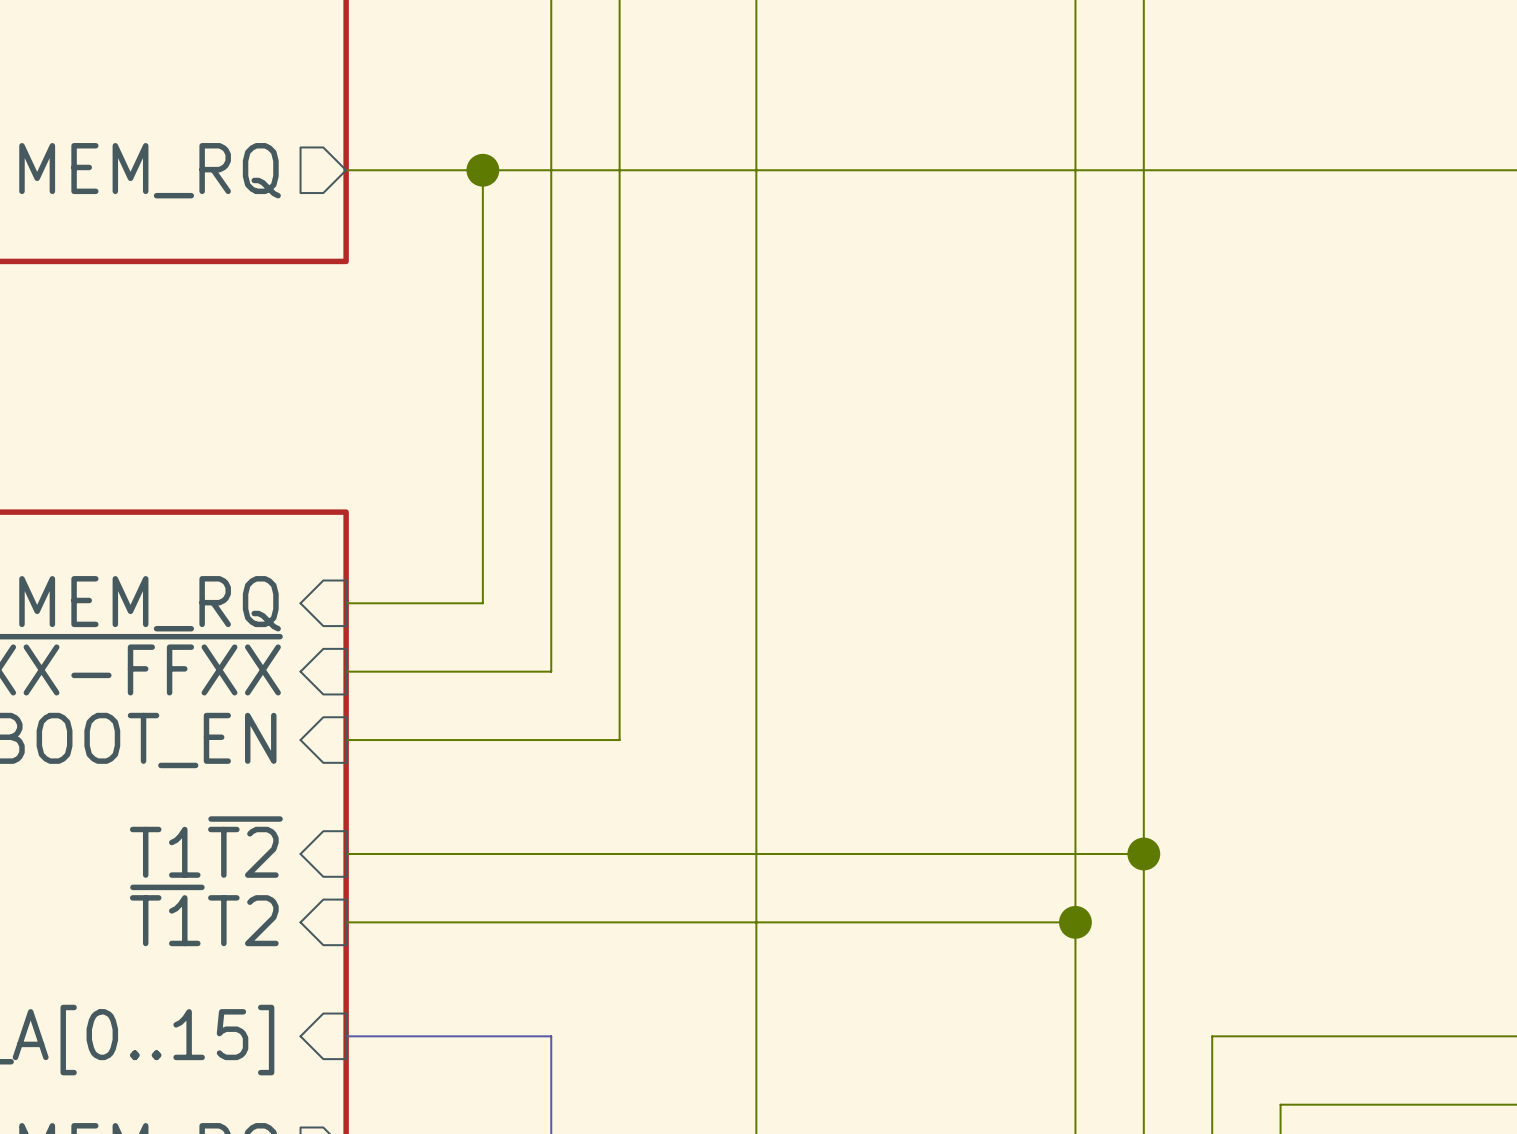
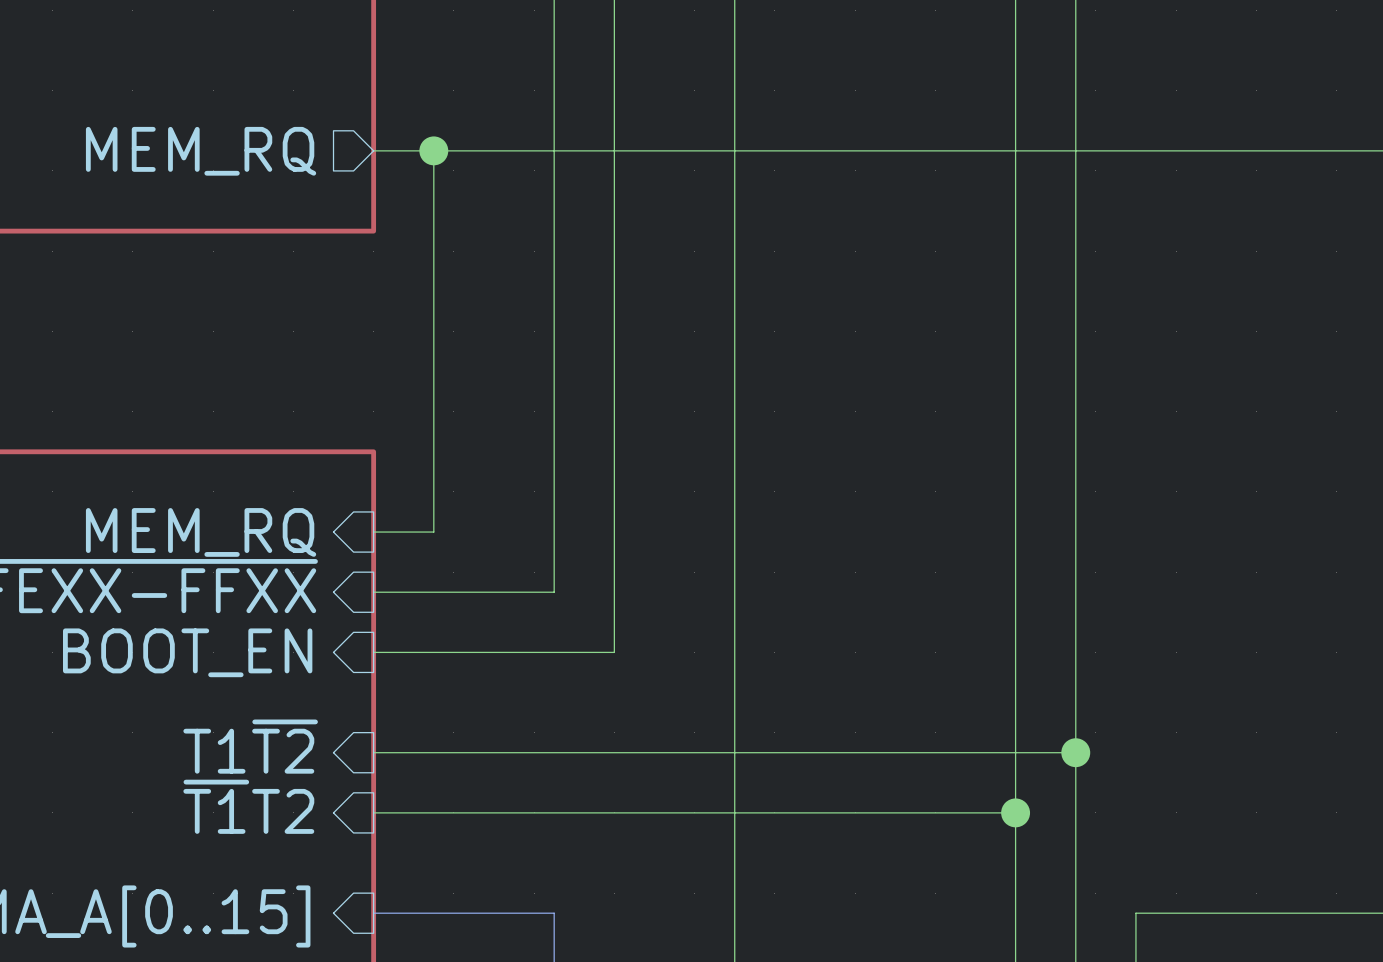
wire: (482, 170) (482, 603) (414, 603) -> (433, 150) (433, 532)
junction position: (482, 170) -> (433, 150)

